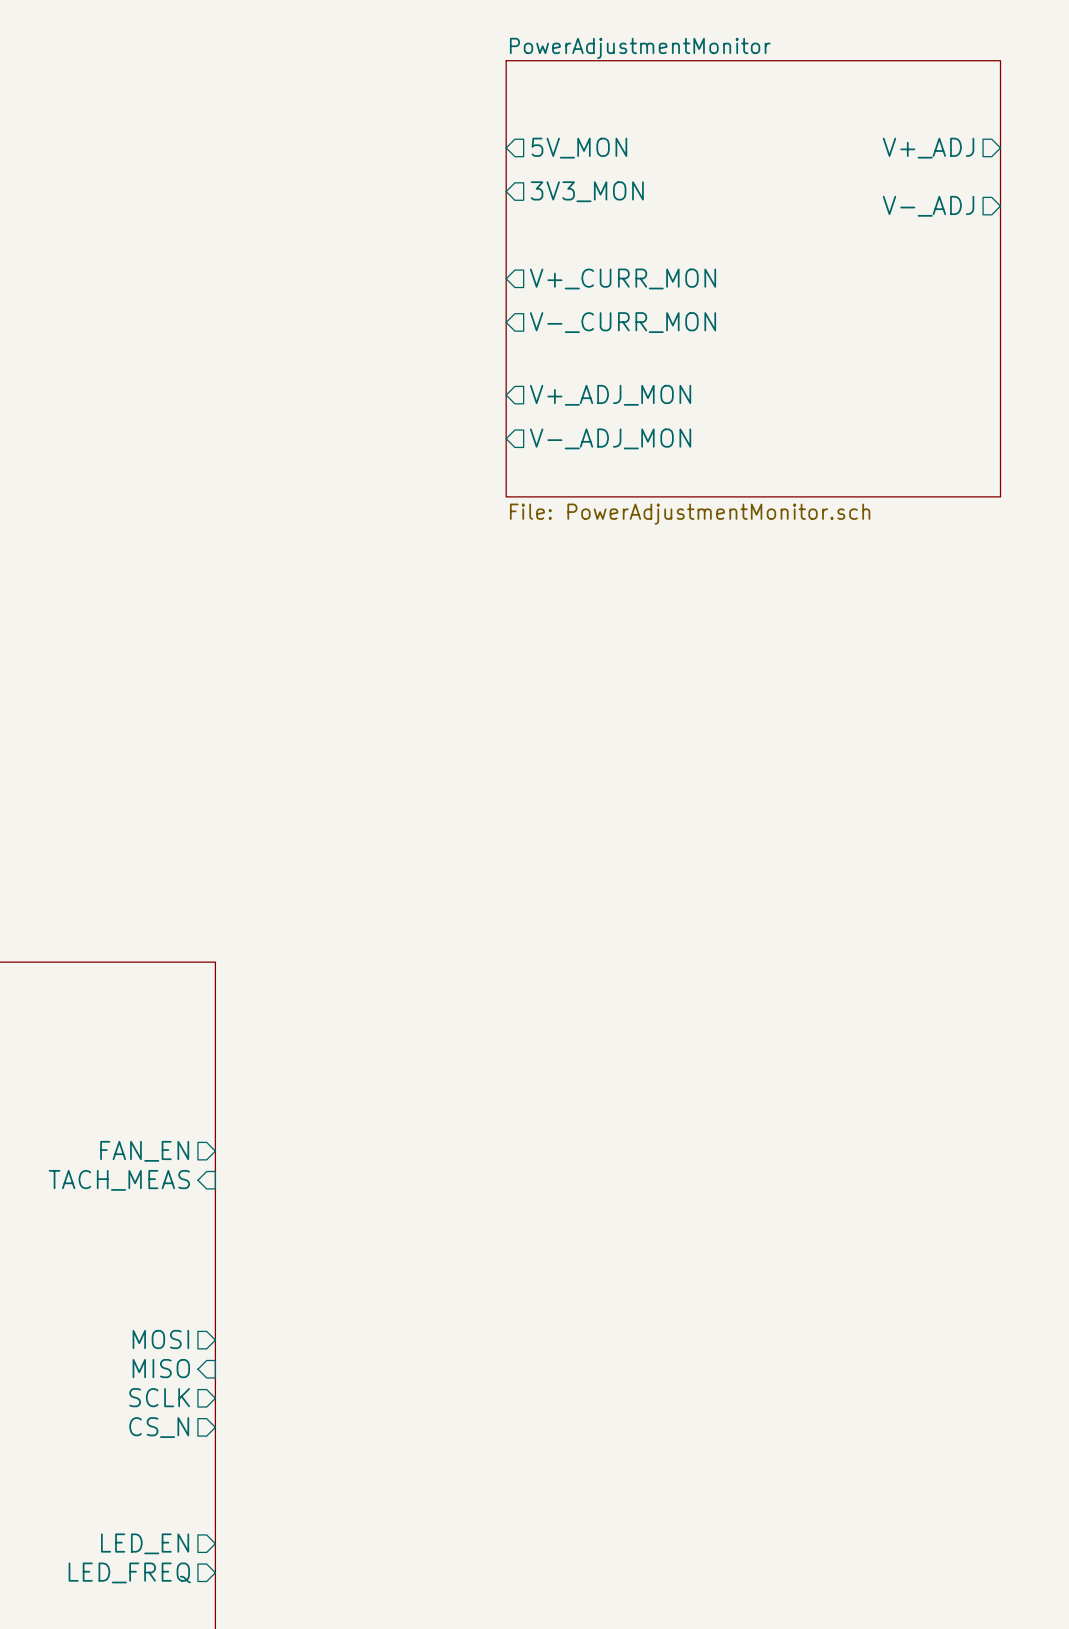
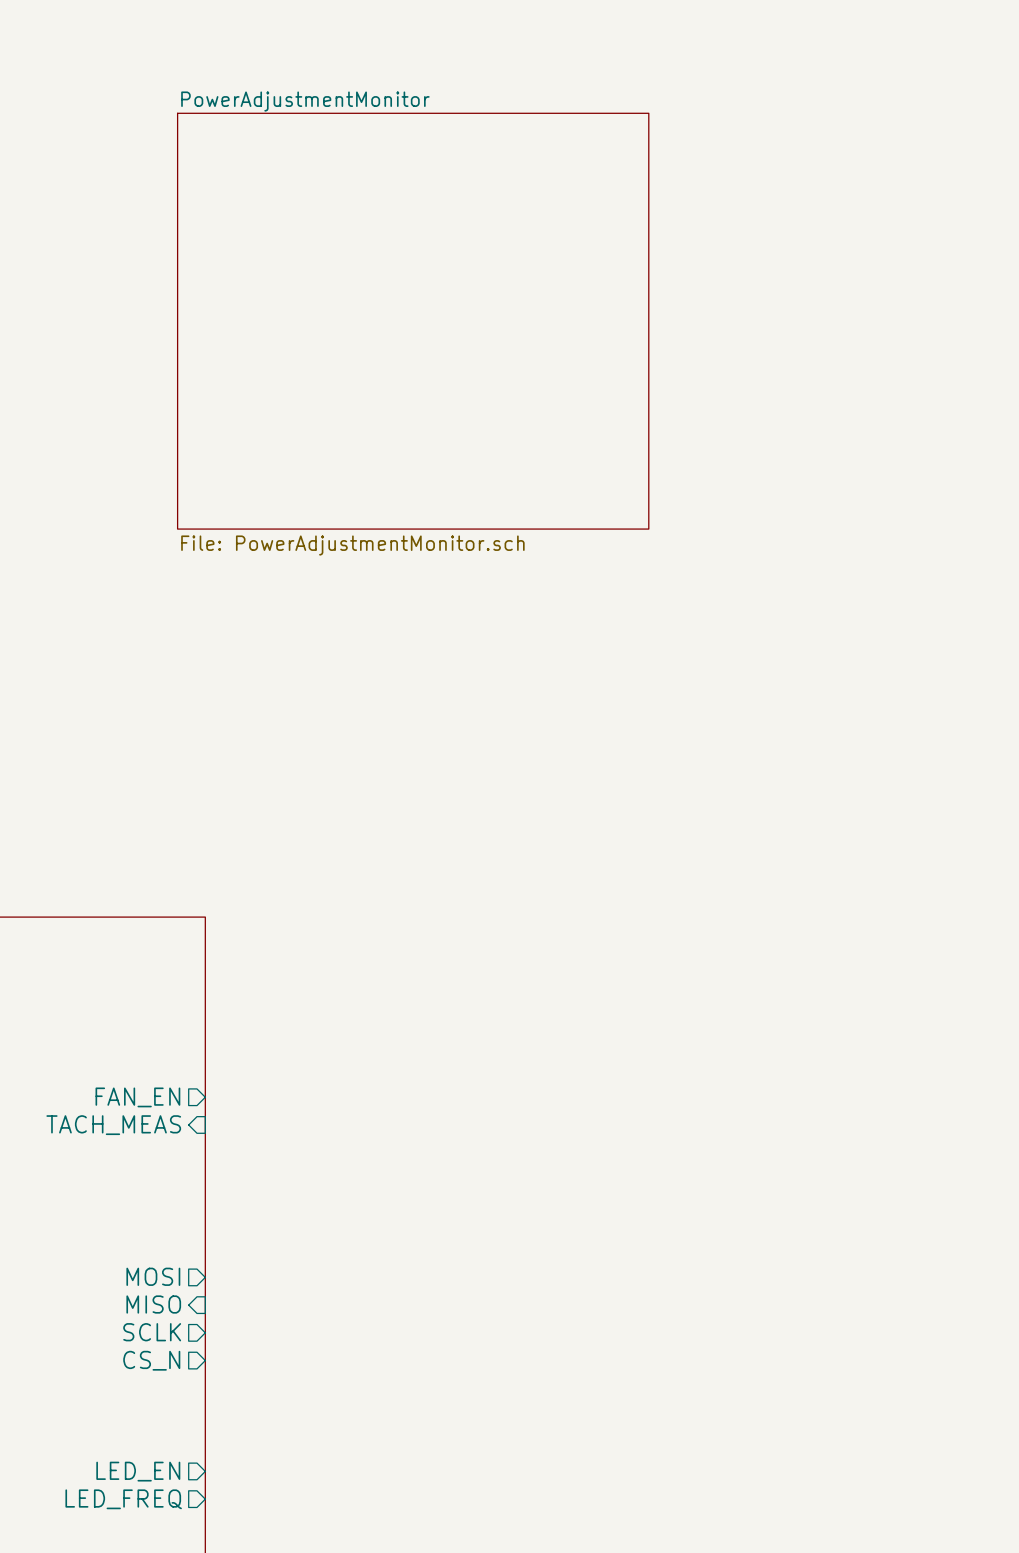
sheet pin: 5V_MON (579, 148) -> none
sheet pin: V+_ADJ (928, 148) -> none
sheet pin: 3V3_MON (587, 191) -> none
sheet pin: V-_ADJ (928, 206) -> none
sheet pin: V+_CURR_MON (623, 278) -> none
sheet PowerAdjustmentMonitor: File: PowerAdjustmentMonitor.sch (753, 278) -> none
sheet pin: V-_CURR_MON (623, 322) -> none
sheet PowerAdjustmentMonitor: none -> File: PowerAdjustmentMonitor.sch (413, 321)
sheet pin: V+_ADJ_MON (610, 395) -> none
sheet pin: V-_ADJ_MON (610, 438) -> none

